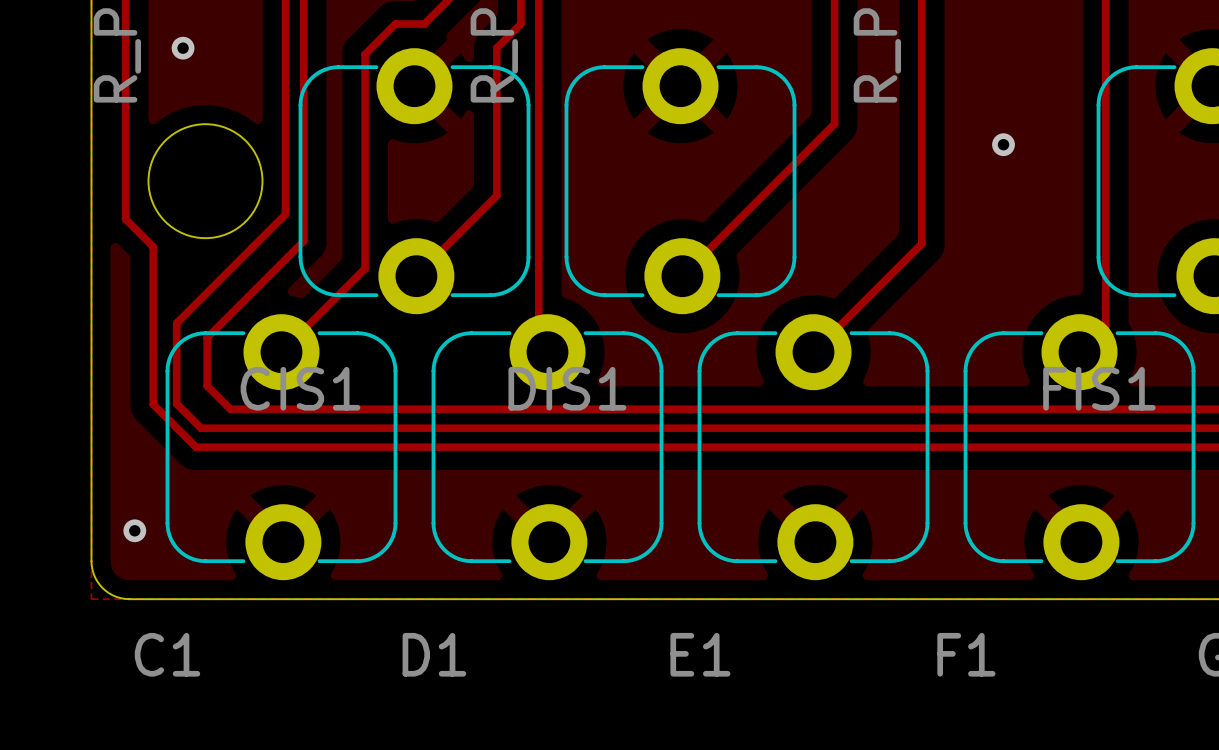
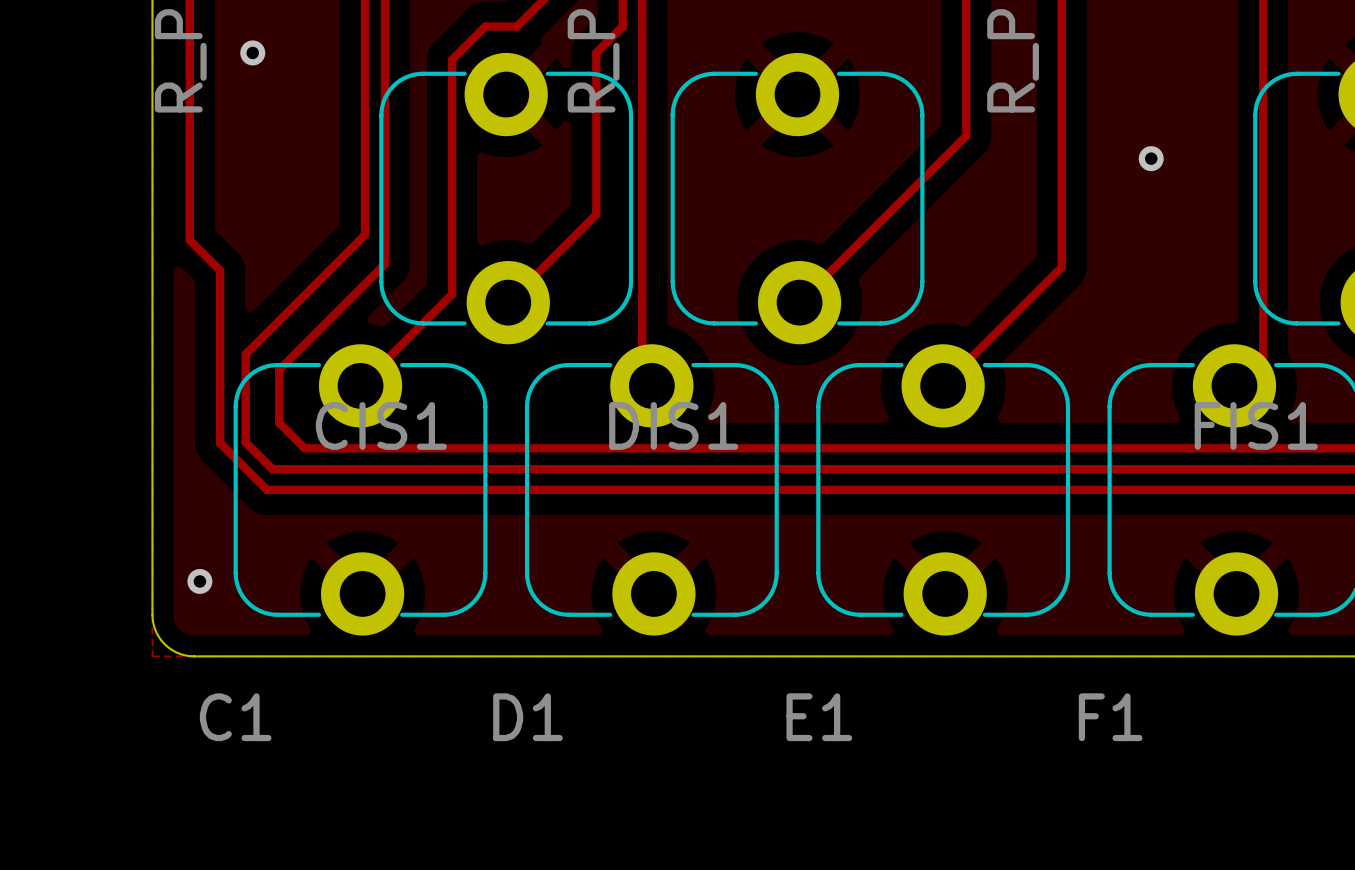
round board edge: [147, 123, 264, 240] -> none

